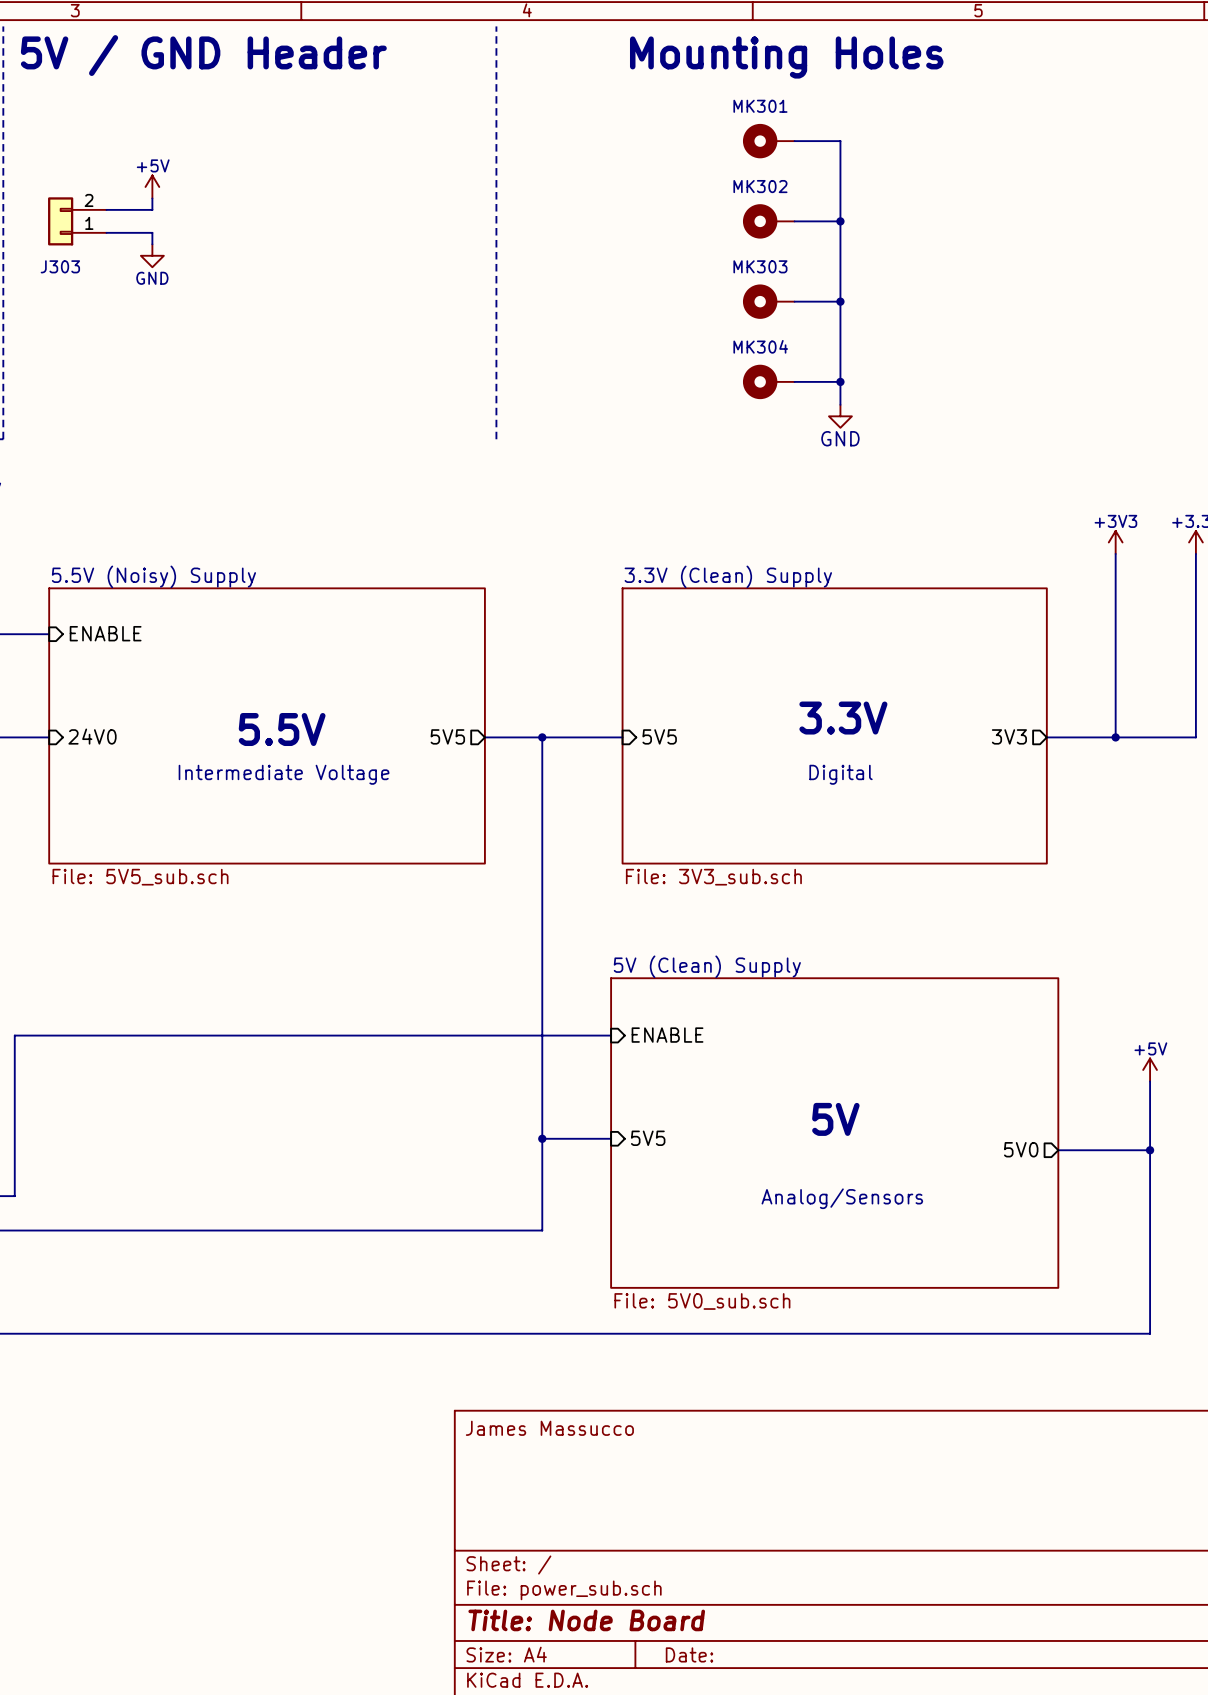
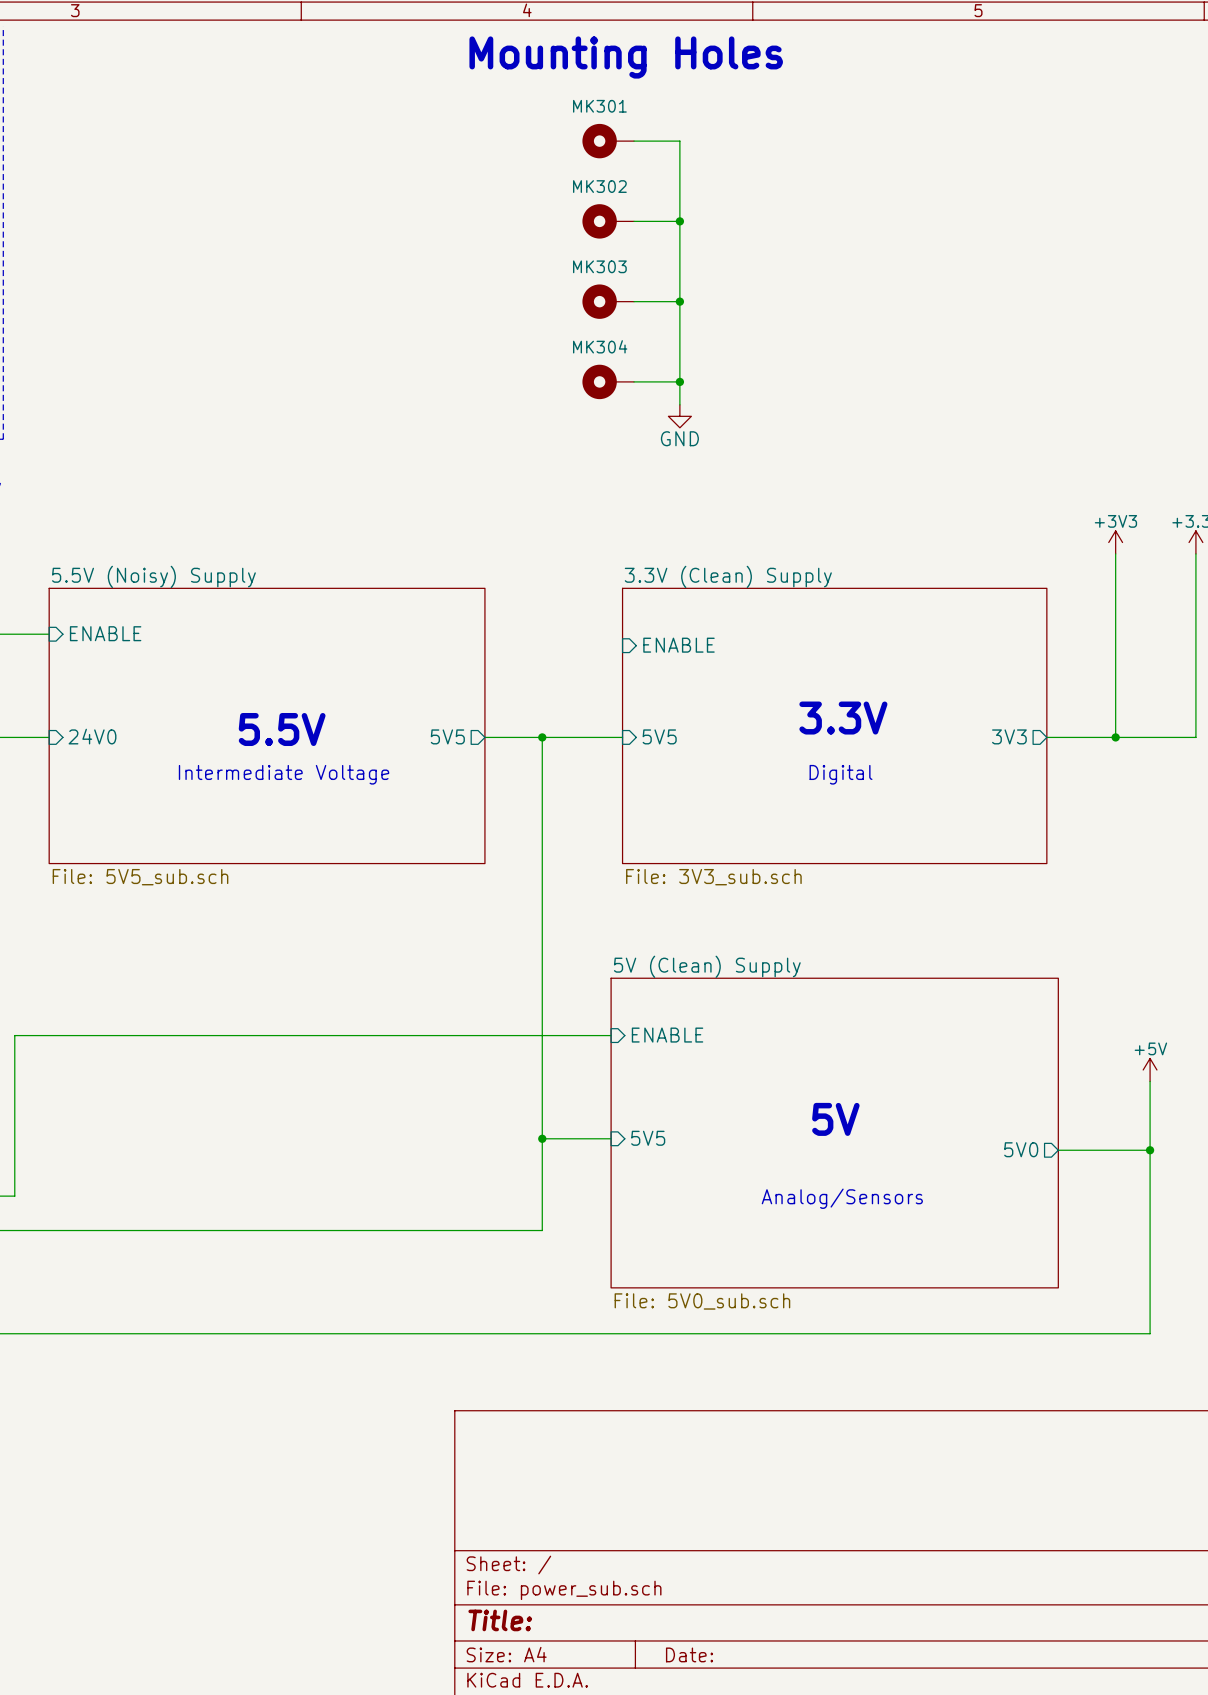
line: (496, 26) (496, 439) -> none
text: 5V / GND Header (203, 55) -> none
text position: Mounting Holes (786, 57) -> Mounting Holes (626, 57)
MK301 position: (768, 141) -> (608, 141)
wire: (794, 141) (840, 141) (840, 404) -> (634, 141) (679, 141) (679, 404)
power symbol: +5V (152, 186) -> none
wire: (152, 198) (152, 209) (106, 209) -> none
J303: (77, 221) -> none
junction: none -> (679, 221)
MK302 position: (768, 221) -> (608, 221)
wire: (794, 221) (840, 221) -> (634, 221) (679, 221)
junction: (840, 221) -> none
wire: (106, 232) (152, 232) (152, 244) -> none
power symbol: GND (152, 255) -> none
junction: none -> (679, 301)
MK303 position: (768, 301) -> (608, 301)
wire: (794, 301) (840, 301) -> (634, 301) (679, 301)
junction: (840, 301) -> none
junction: none -> (679, 381)
MK304 position: (768, 381) -> (608, 381)
wire: (794, 381) (840, 381) -> (634, 381) (679, 381)
junction: (840, 381) -> none
power symbol position: GND (840, 416) -> GND (679, 416)
sheet pin: none -> ENABLE (679, 645)
title block: James Massucco (549, 1428) -> none
title block: Title: Node Board (586, 1620) -> Title: (500, 1620)

